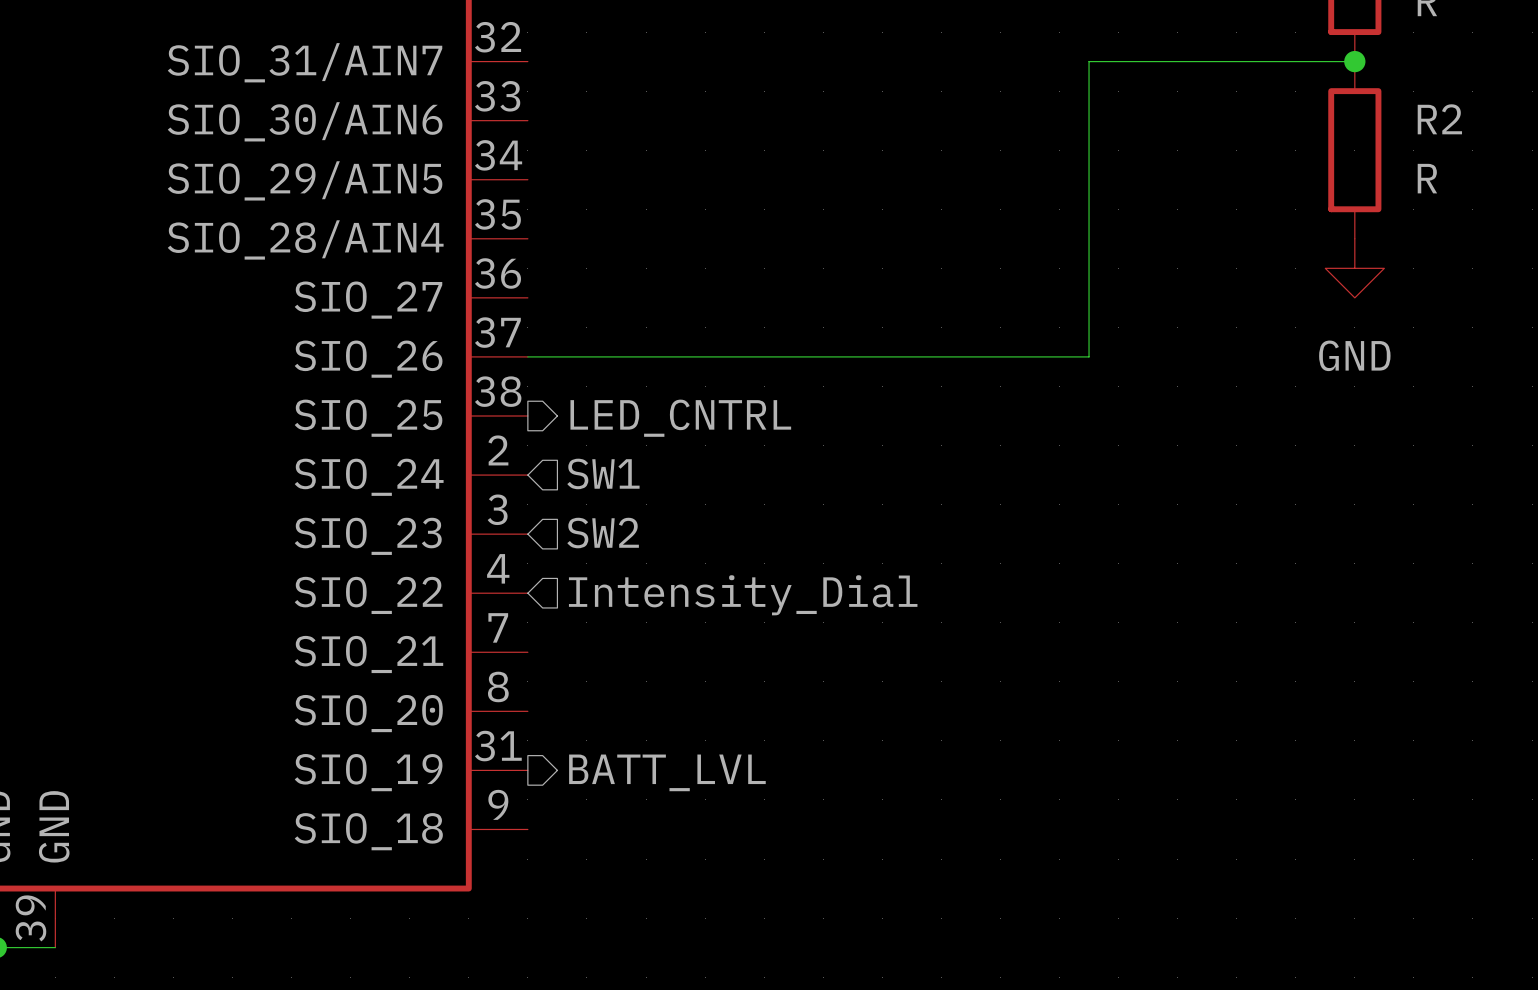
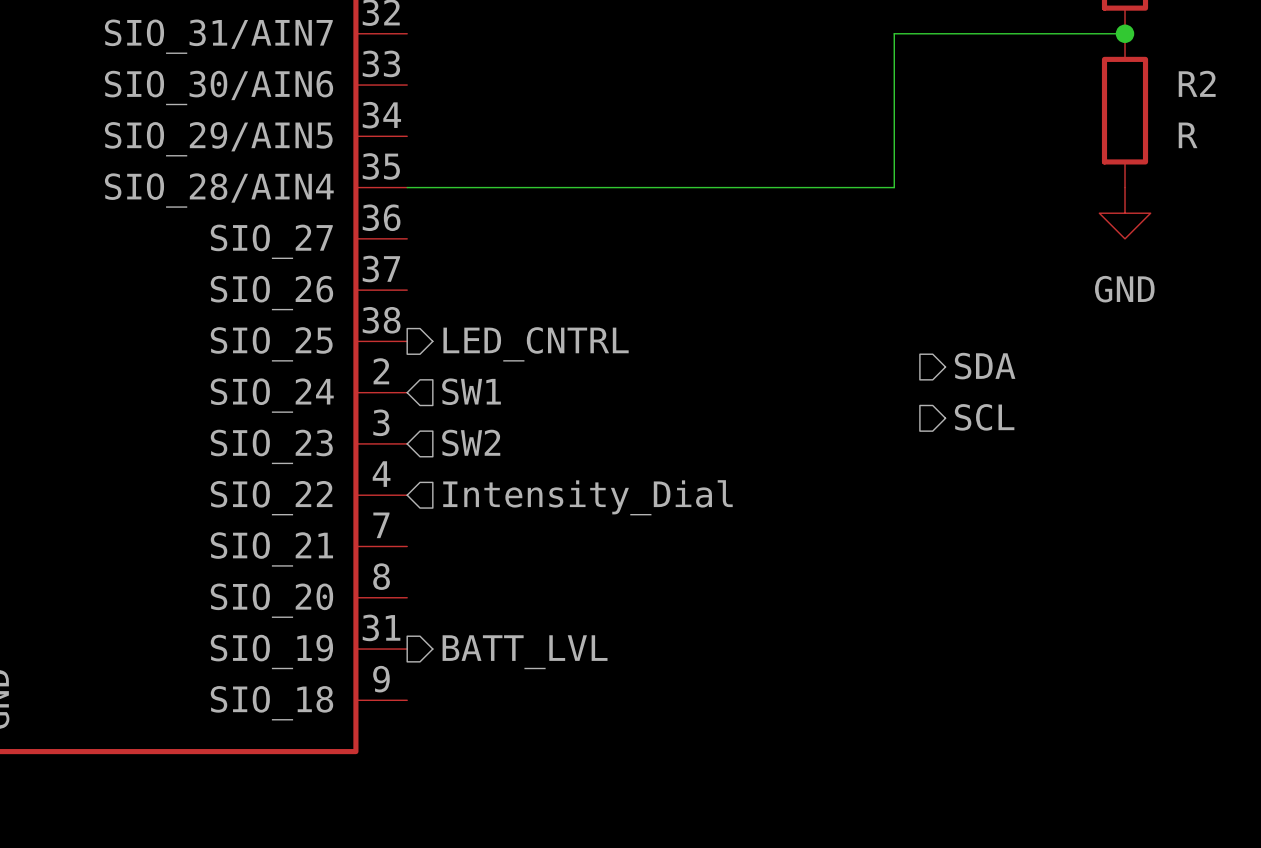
wire: (1089, 238) (1089, 356) (527, 356) -> (894, 187) (407, 187)
hierarchical label: none -> SDA (985, 366)
hierarchical label: none -> SCL (984, 417)

